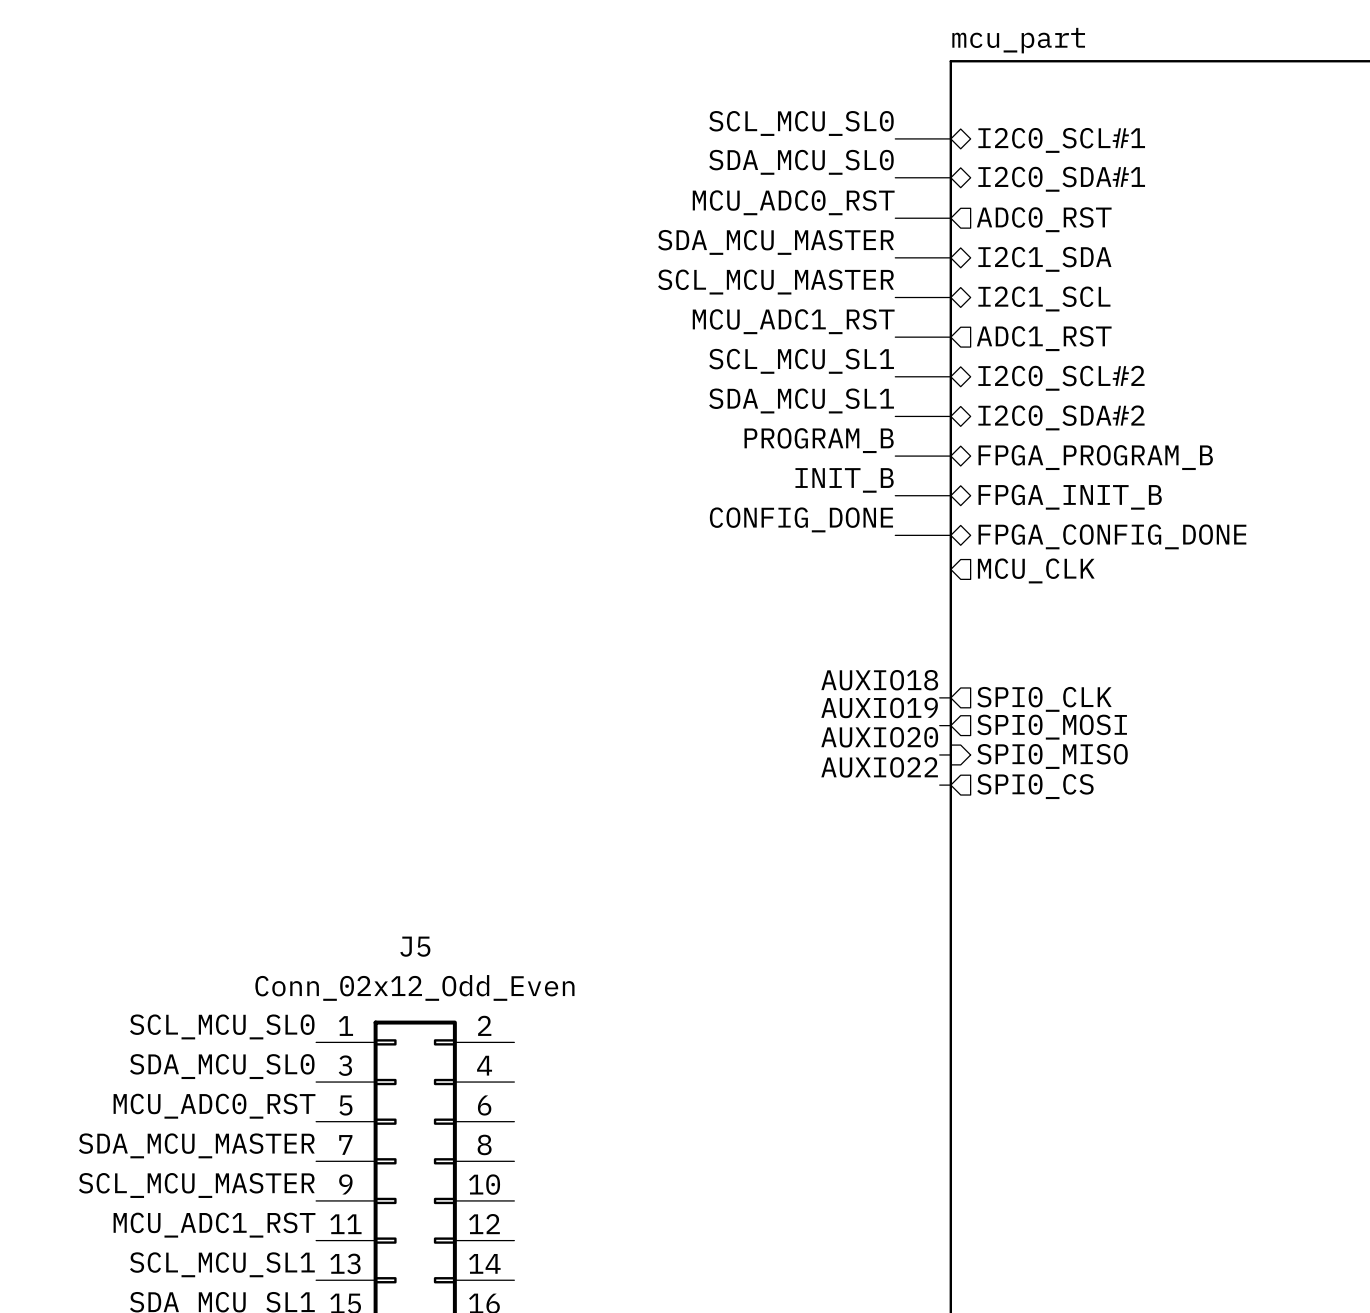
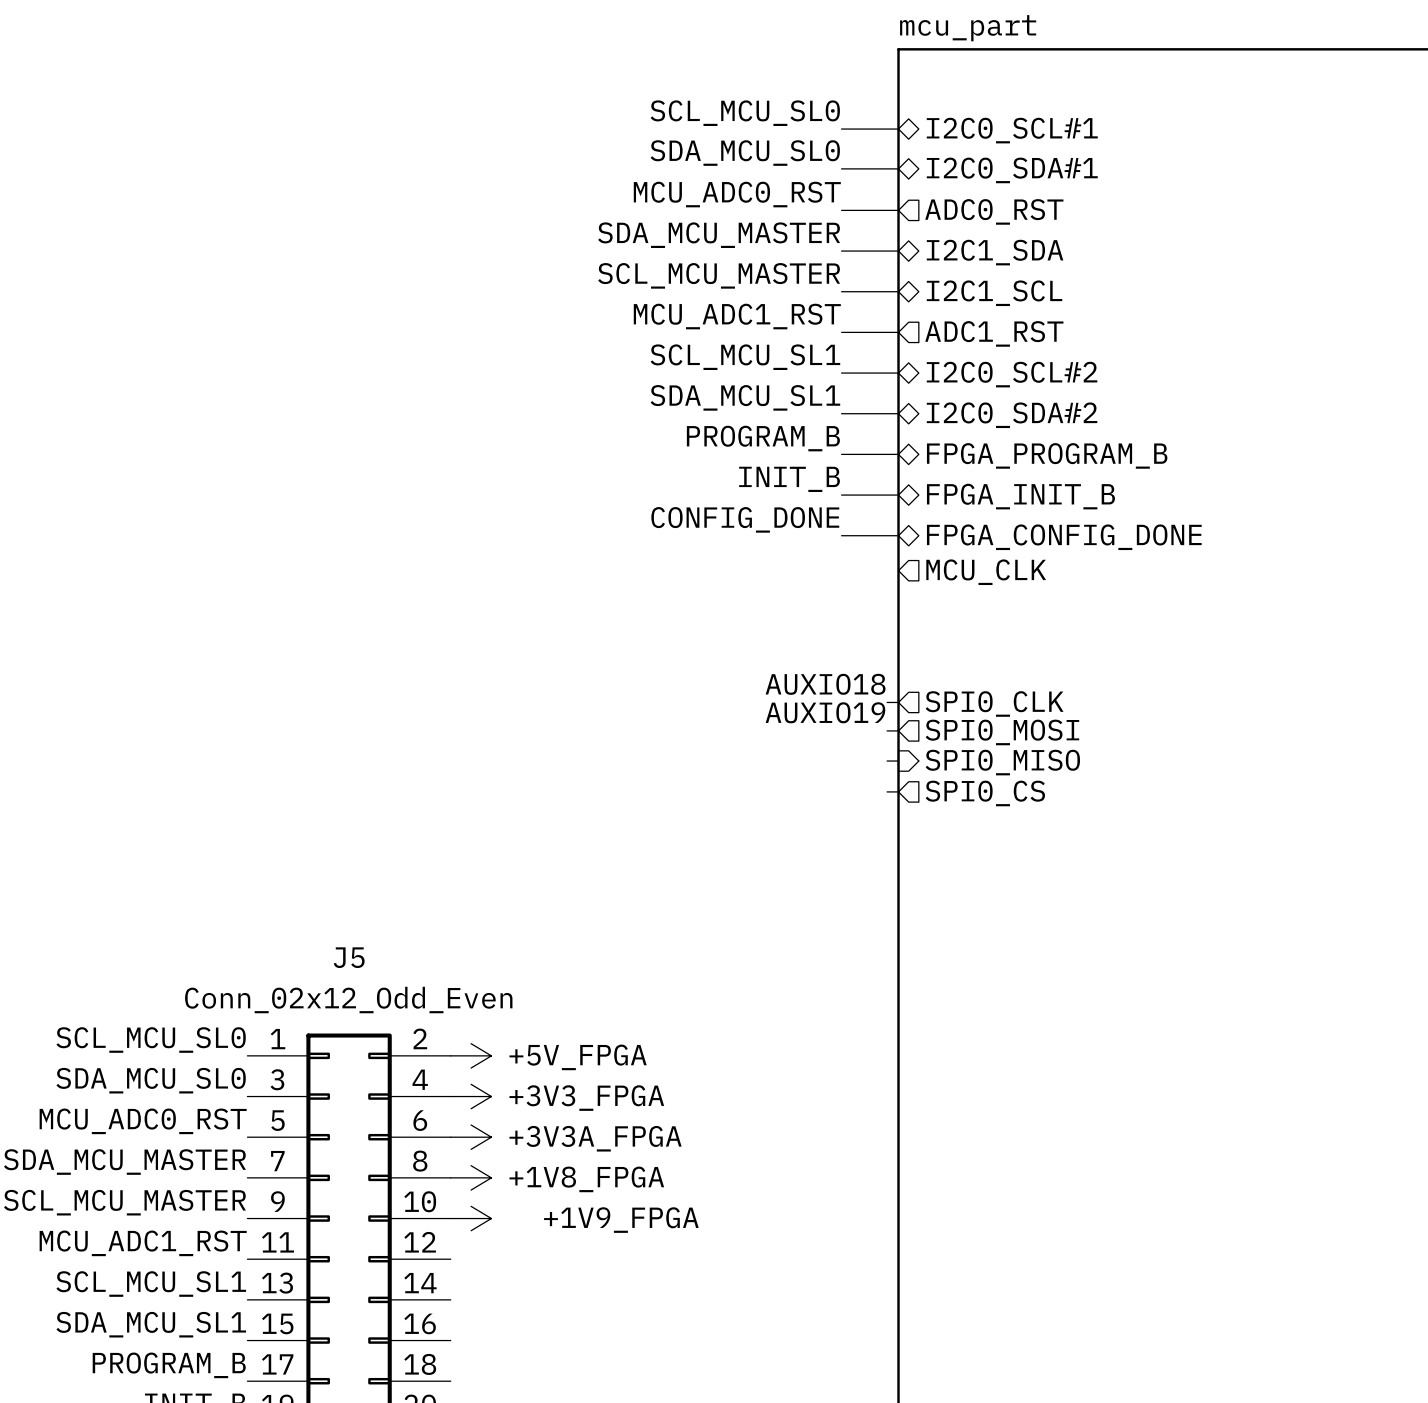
label: AUXIO20 (879, 737) -> none
label: AUXIO22 (879, 767) -> none
power symbol: none -> +5V_FPGA (471, 1055)
power symbol: none -> +3V3_FPGA (471, 1096)
power symbol: none -> +3V3A_FPGA (471, 1137)
power symbol: none -> +1V8_FPGA (471, 1177)
power symbol: none -> +1V9_FPGA (471, 1218)

